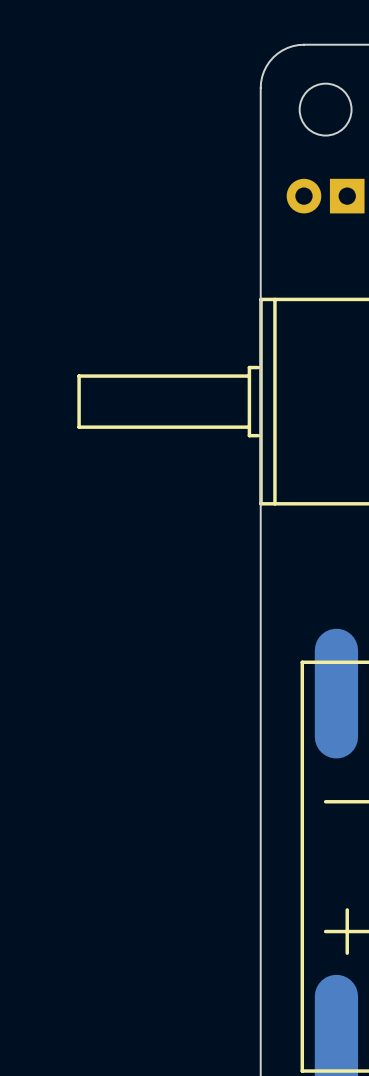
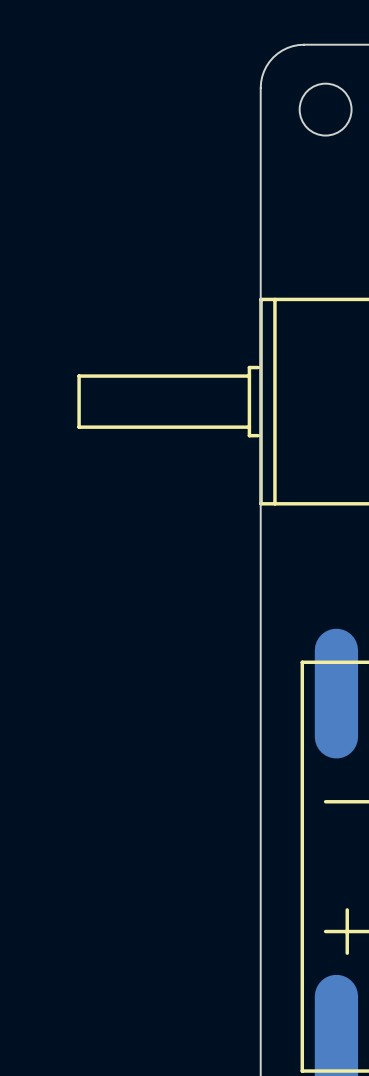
part: (325, 196) -> none

